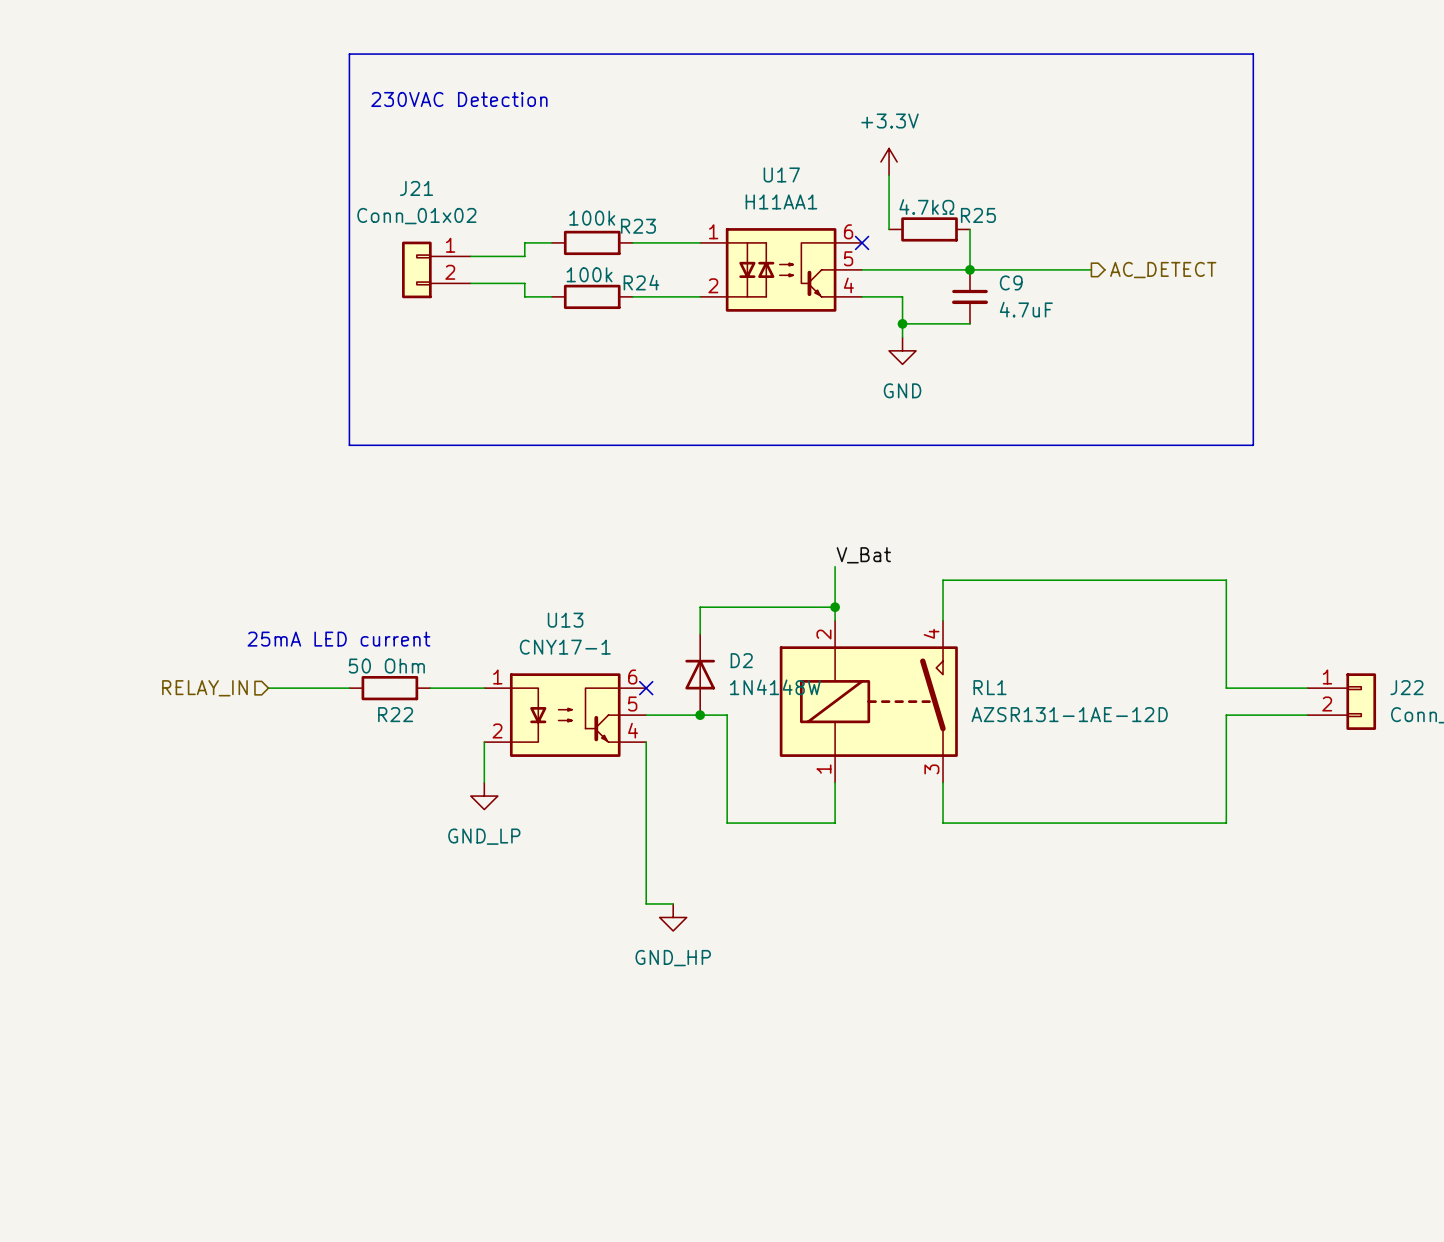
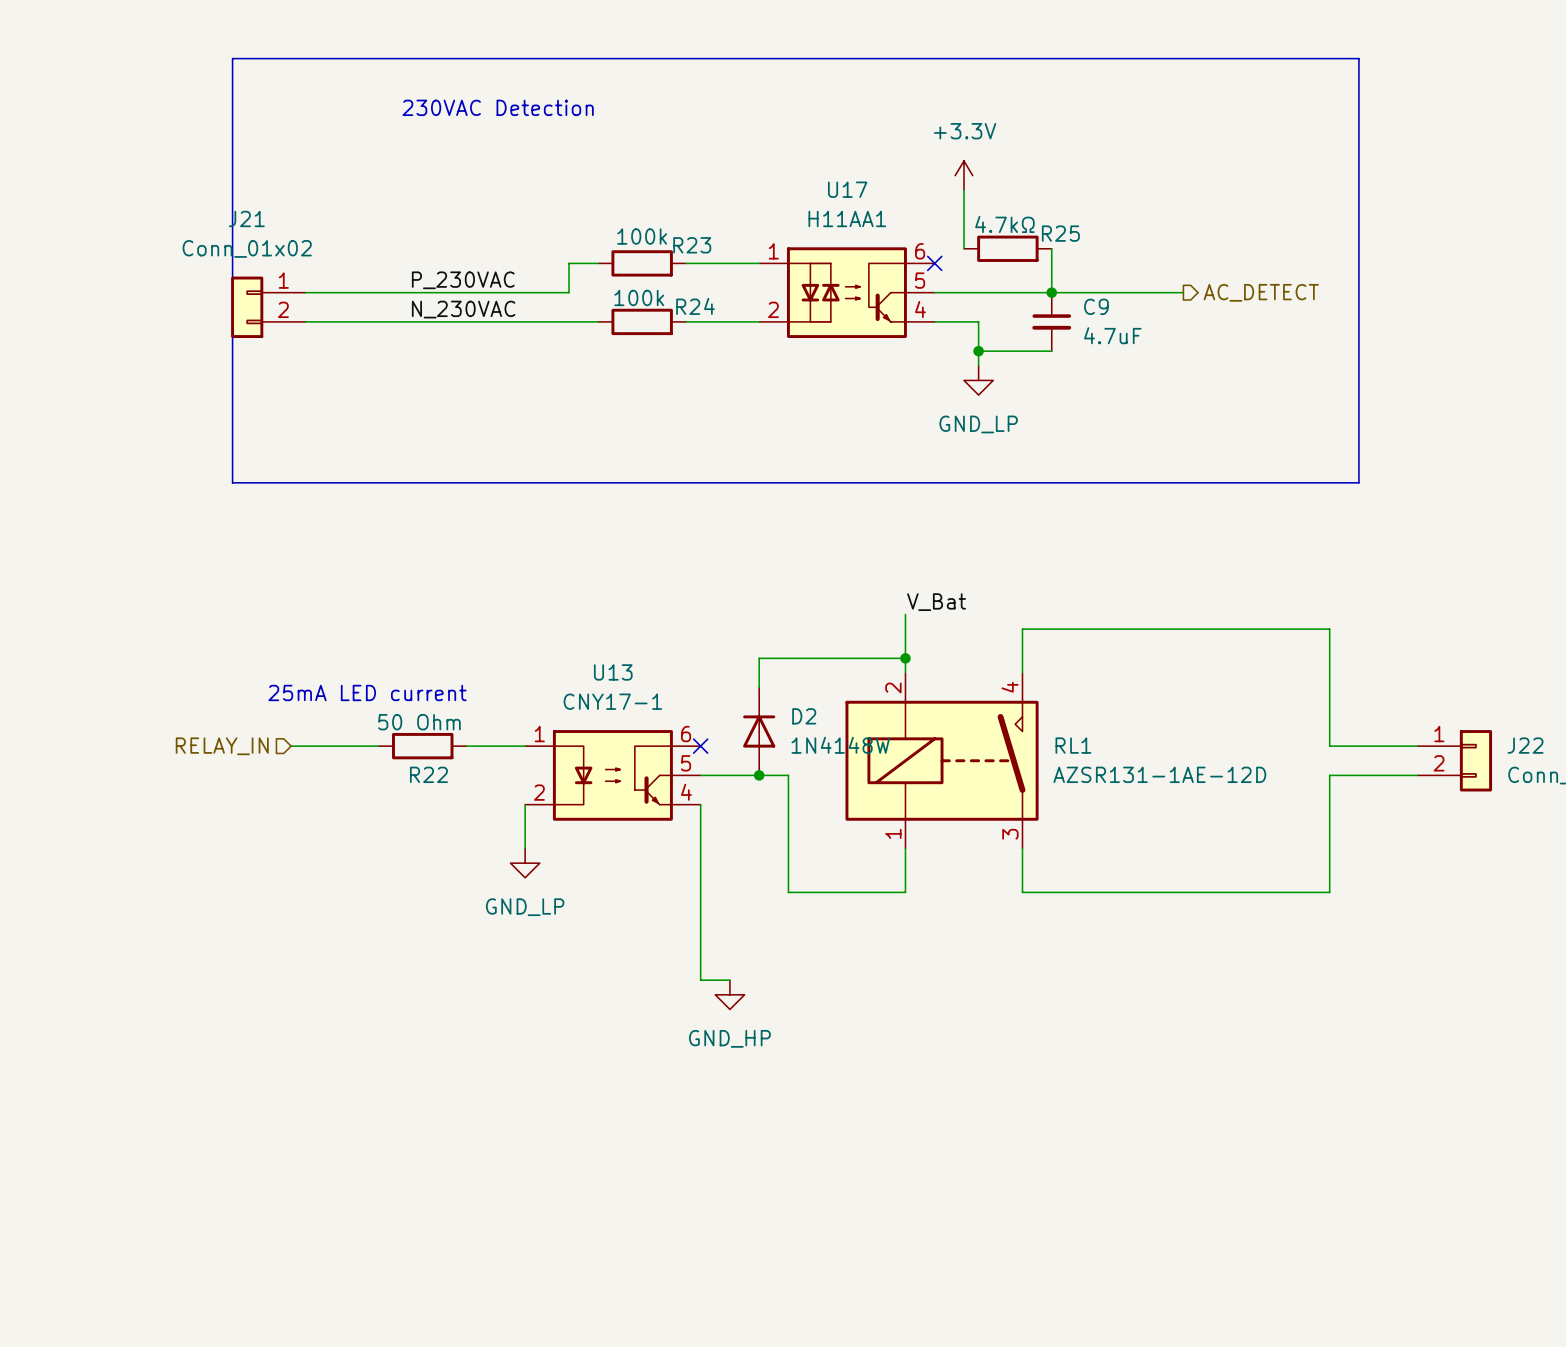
line: (349, 54) (349, 445) -> (378, 58) (232, 58) (232, 482) (378, 482)
wire: (470, 256) (524, 256) -> (305, 292) (569, 292) (569, 278)
label: none -> P_230VAC (463, 280)
J21 position: (436, 269) -> (268, 307)
wire: (470, 283) (524, 283) (524, 296) -> (305, 321) (569, 321)
label: none -> N_230VAC (463, 309)
power symbol: GND (902, 350) -> GND_LP (978, 380)

